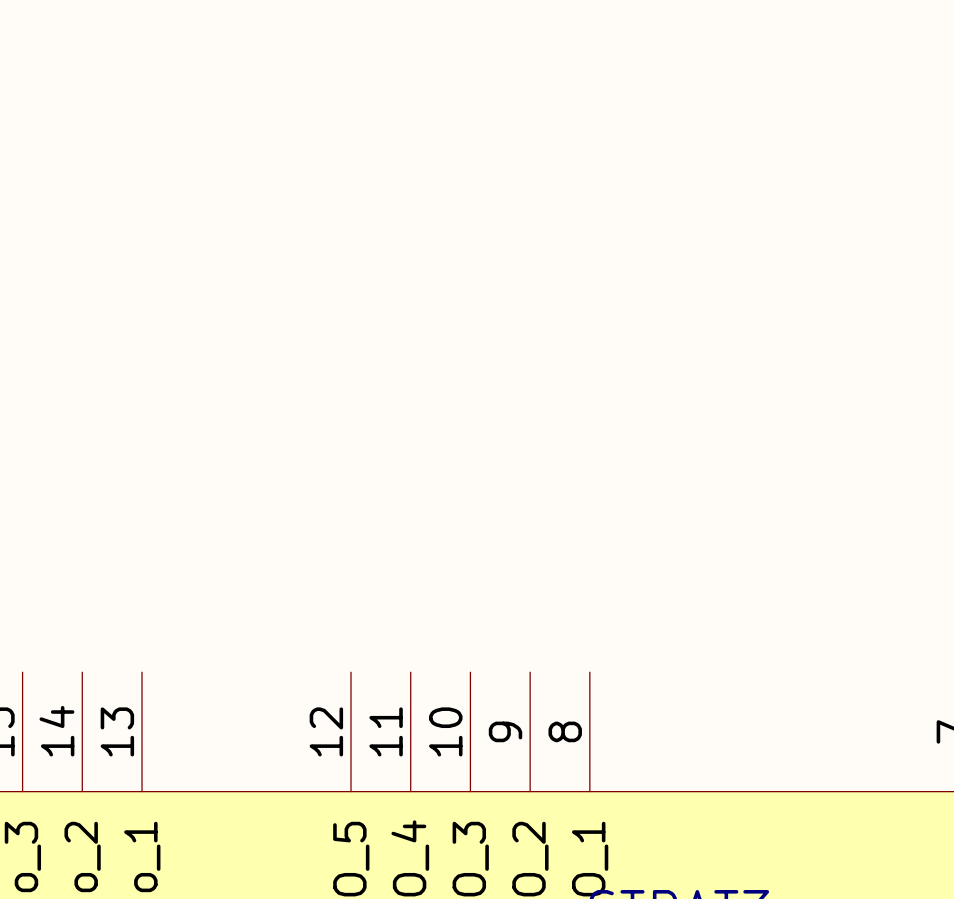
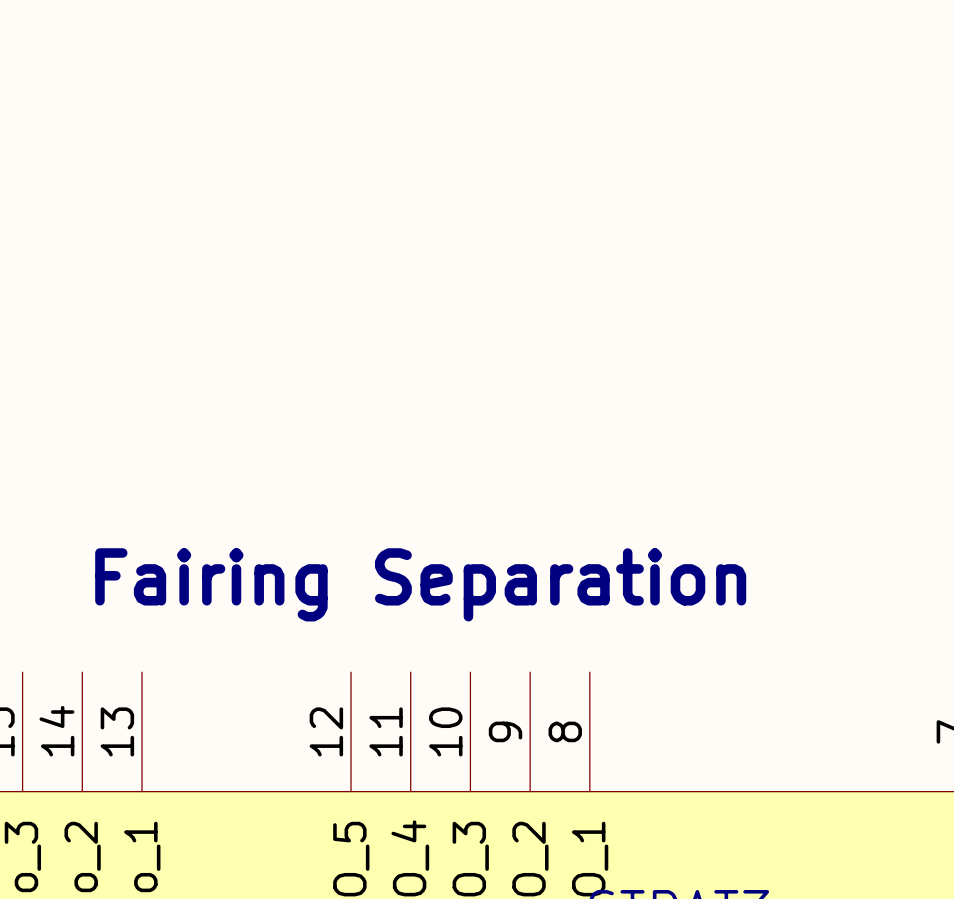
text: none -> Fairing Separation (420, 584)

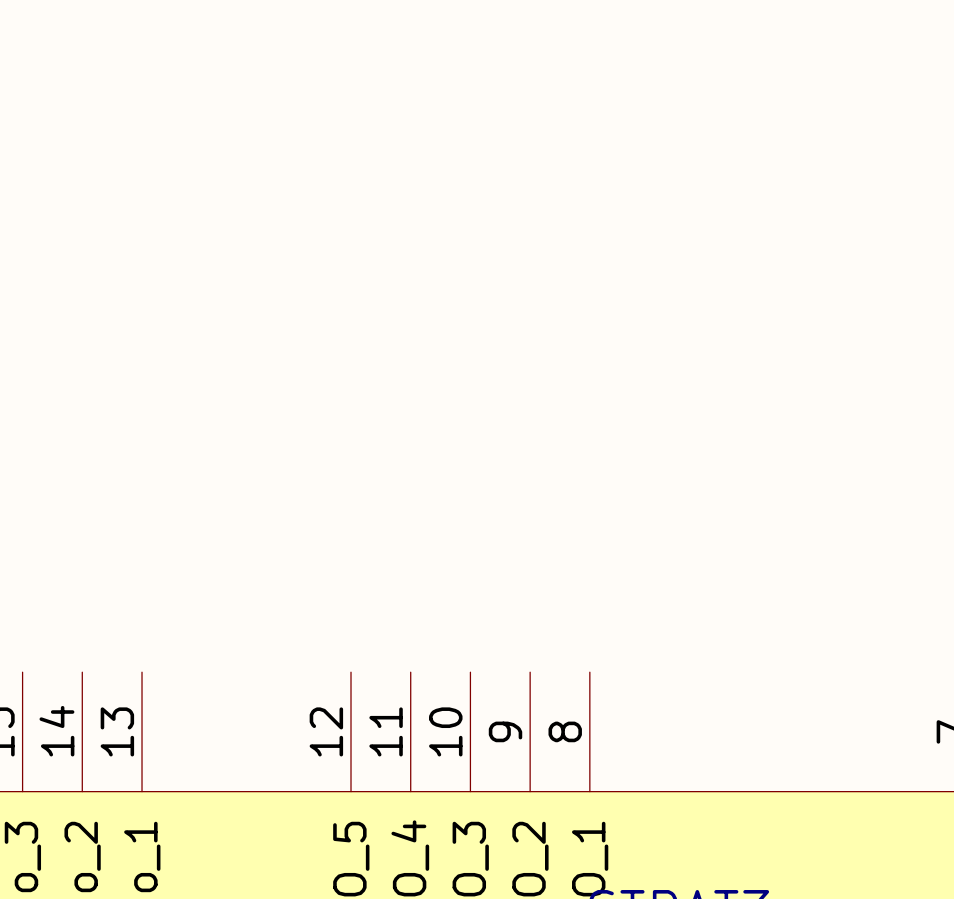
text: Fairing Separation (420, 584) -> none

